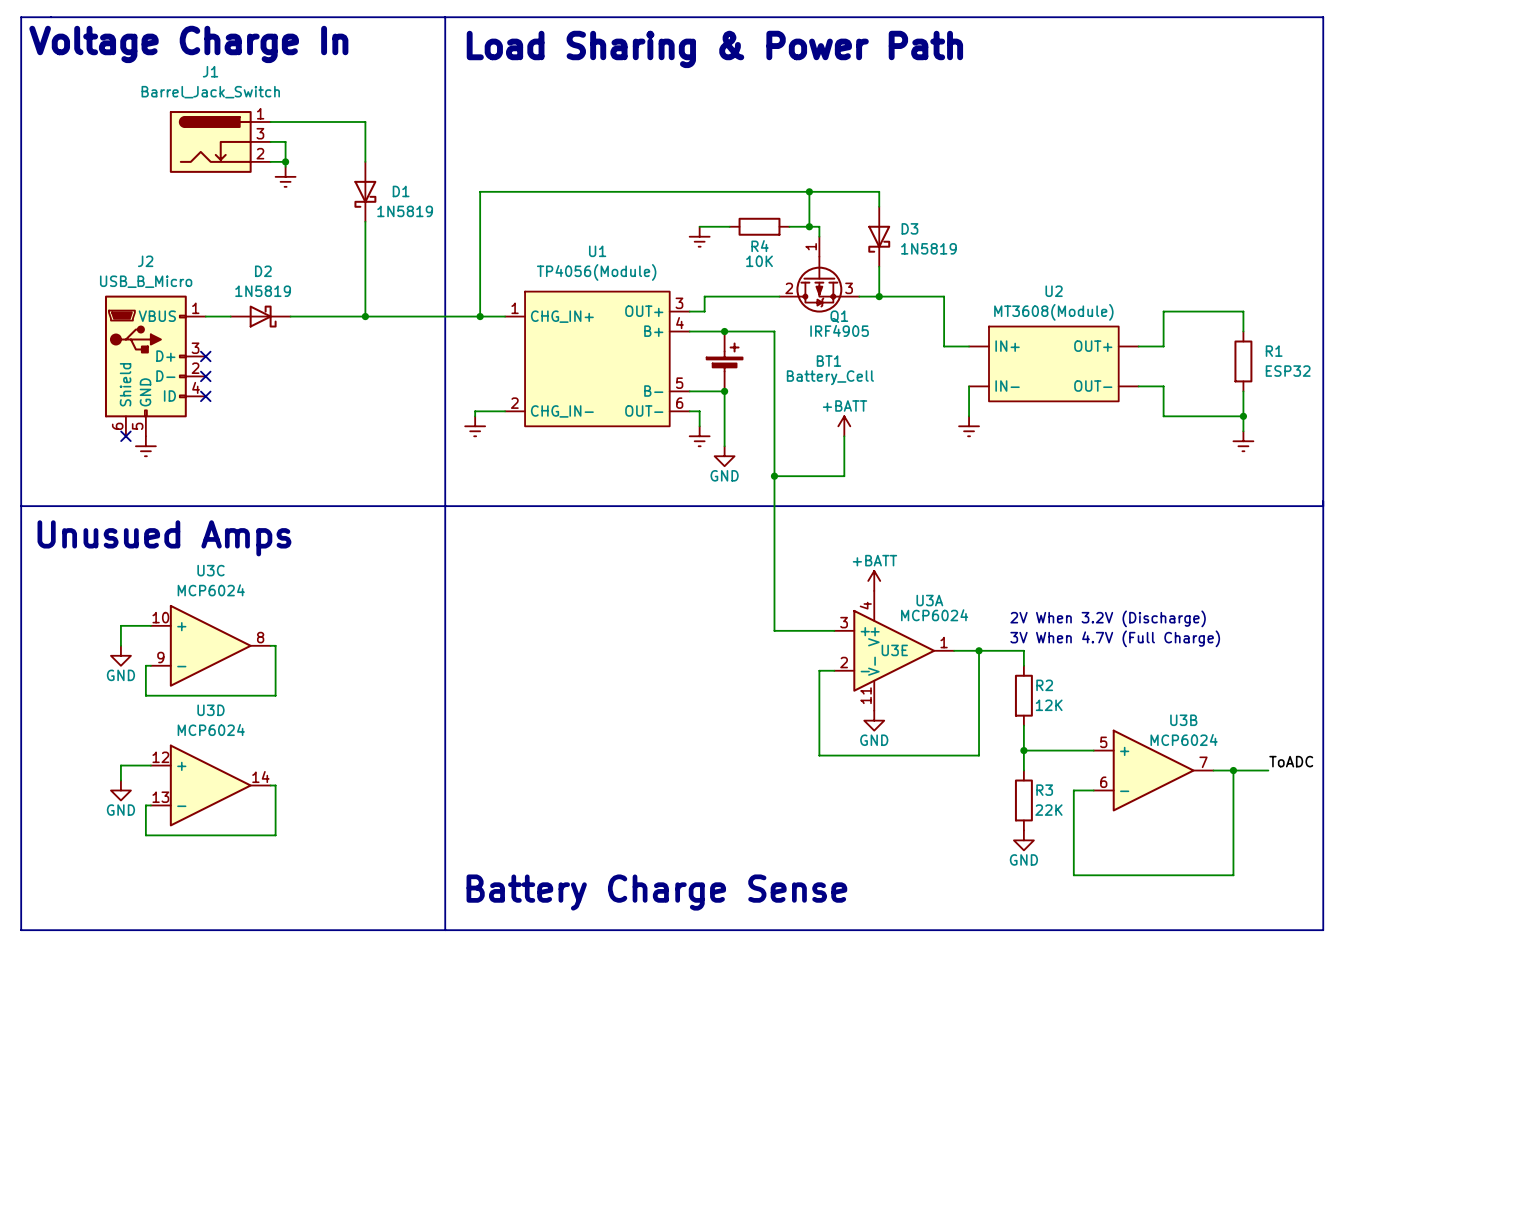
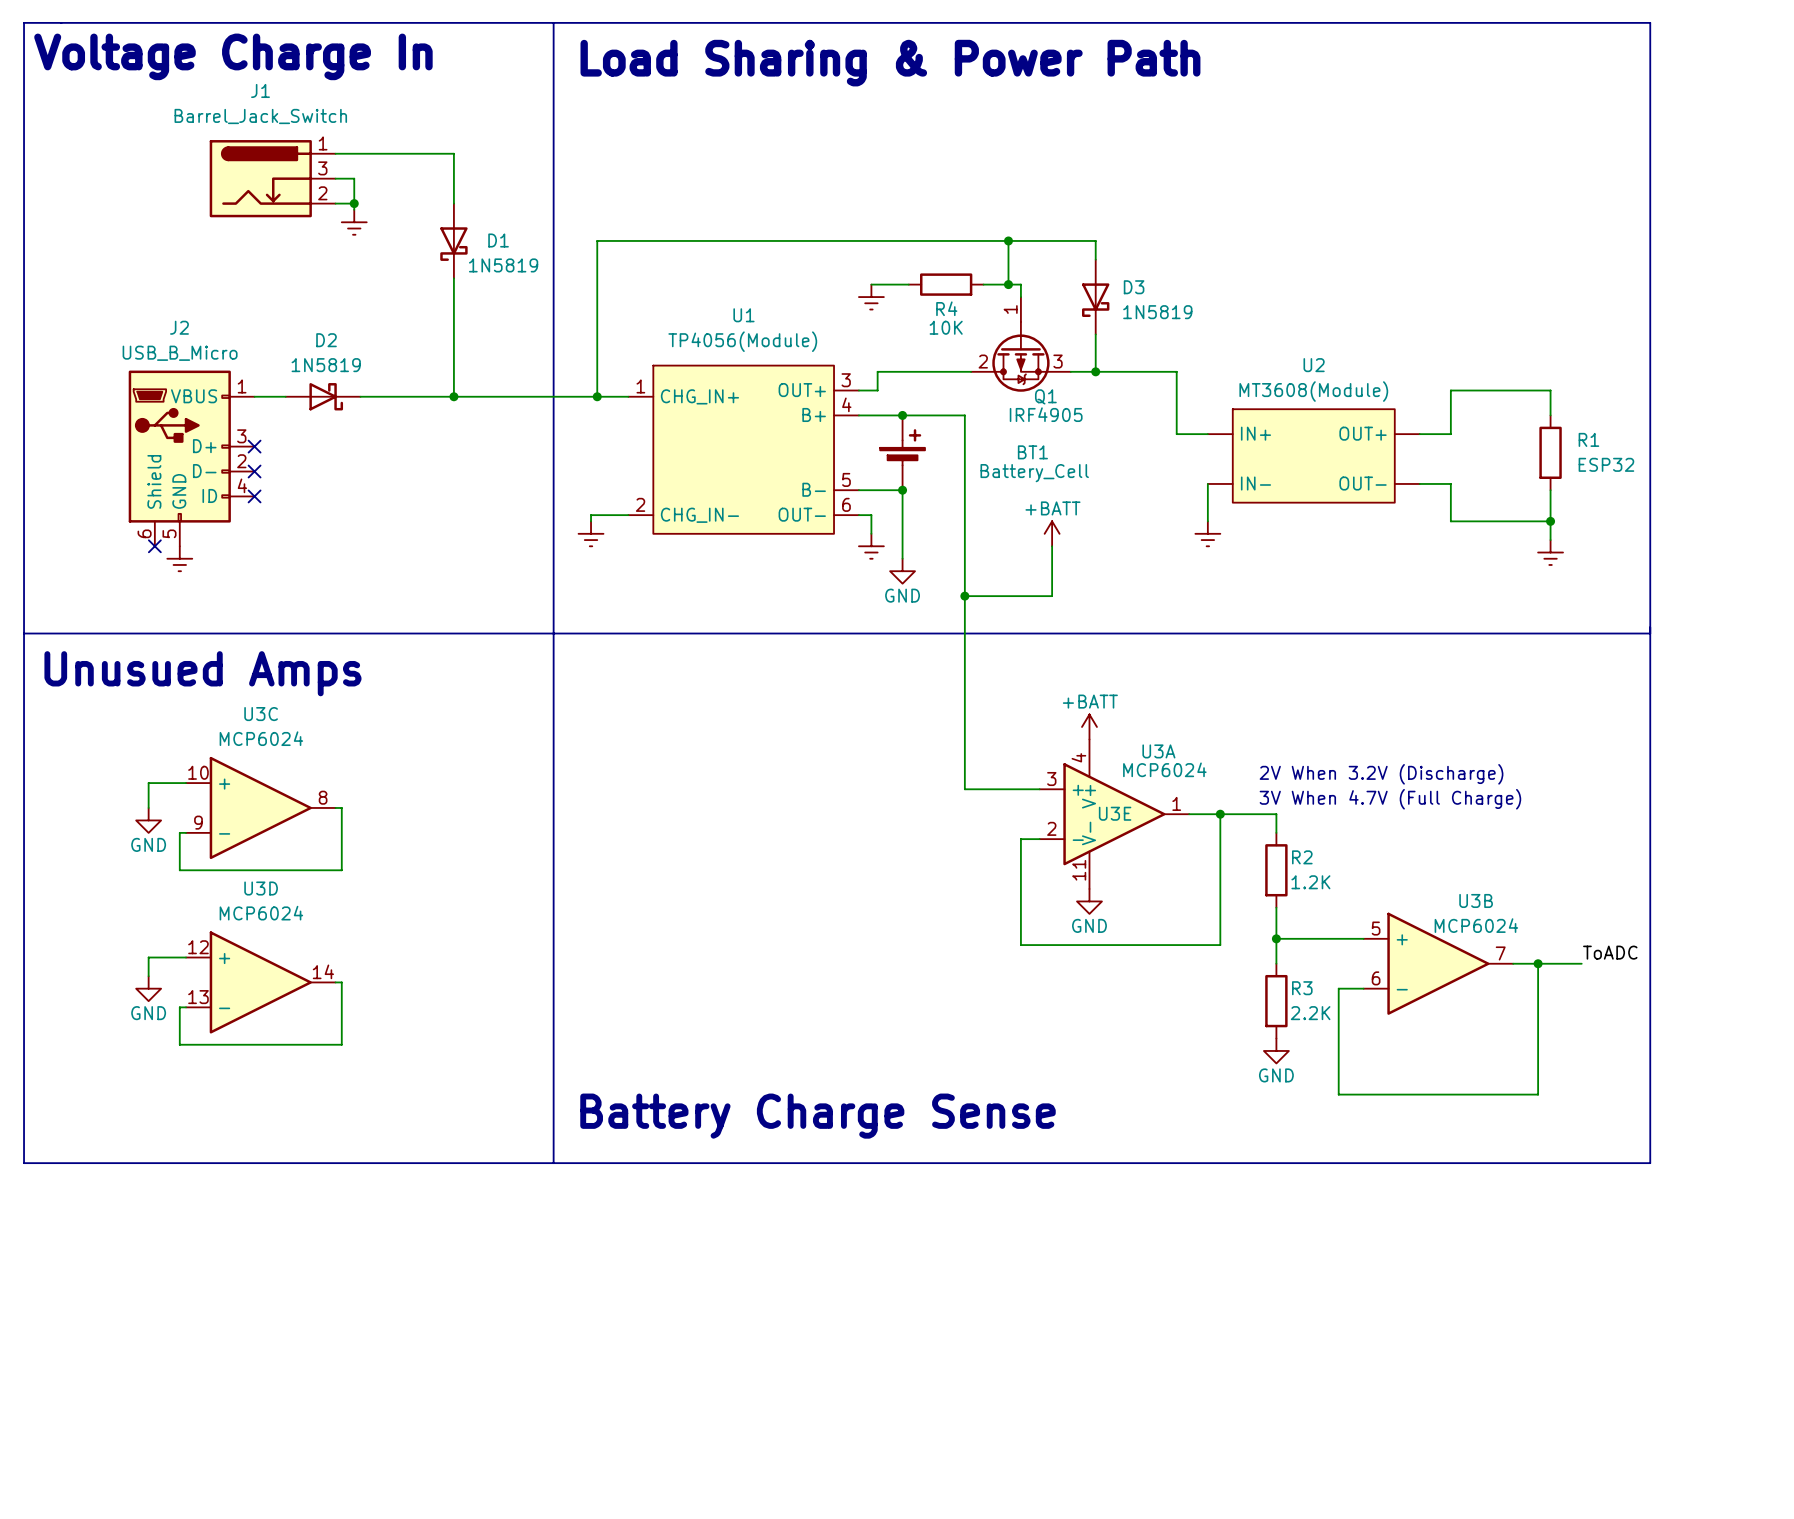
R2 value: 12K (1049, 705) -> 1.2K (1310, 882)
R3 value: 22K (1048, 810) -> 2.2K (1310, 1013)

